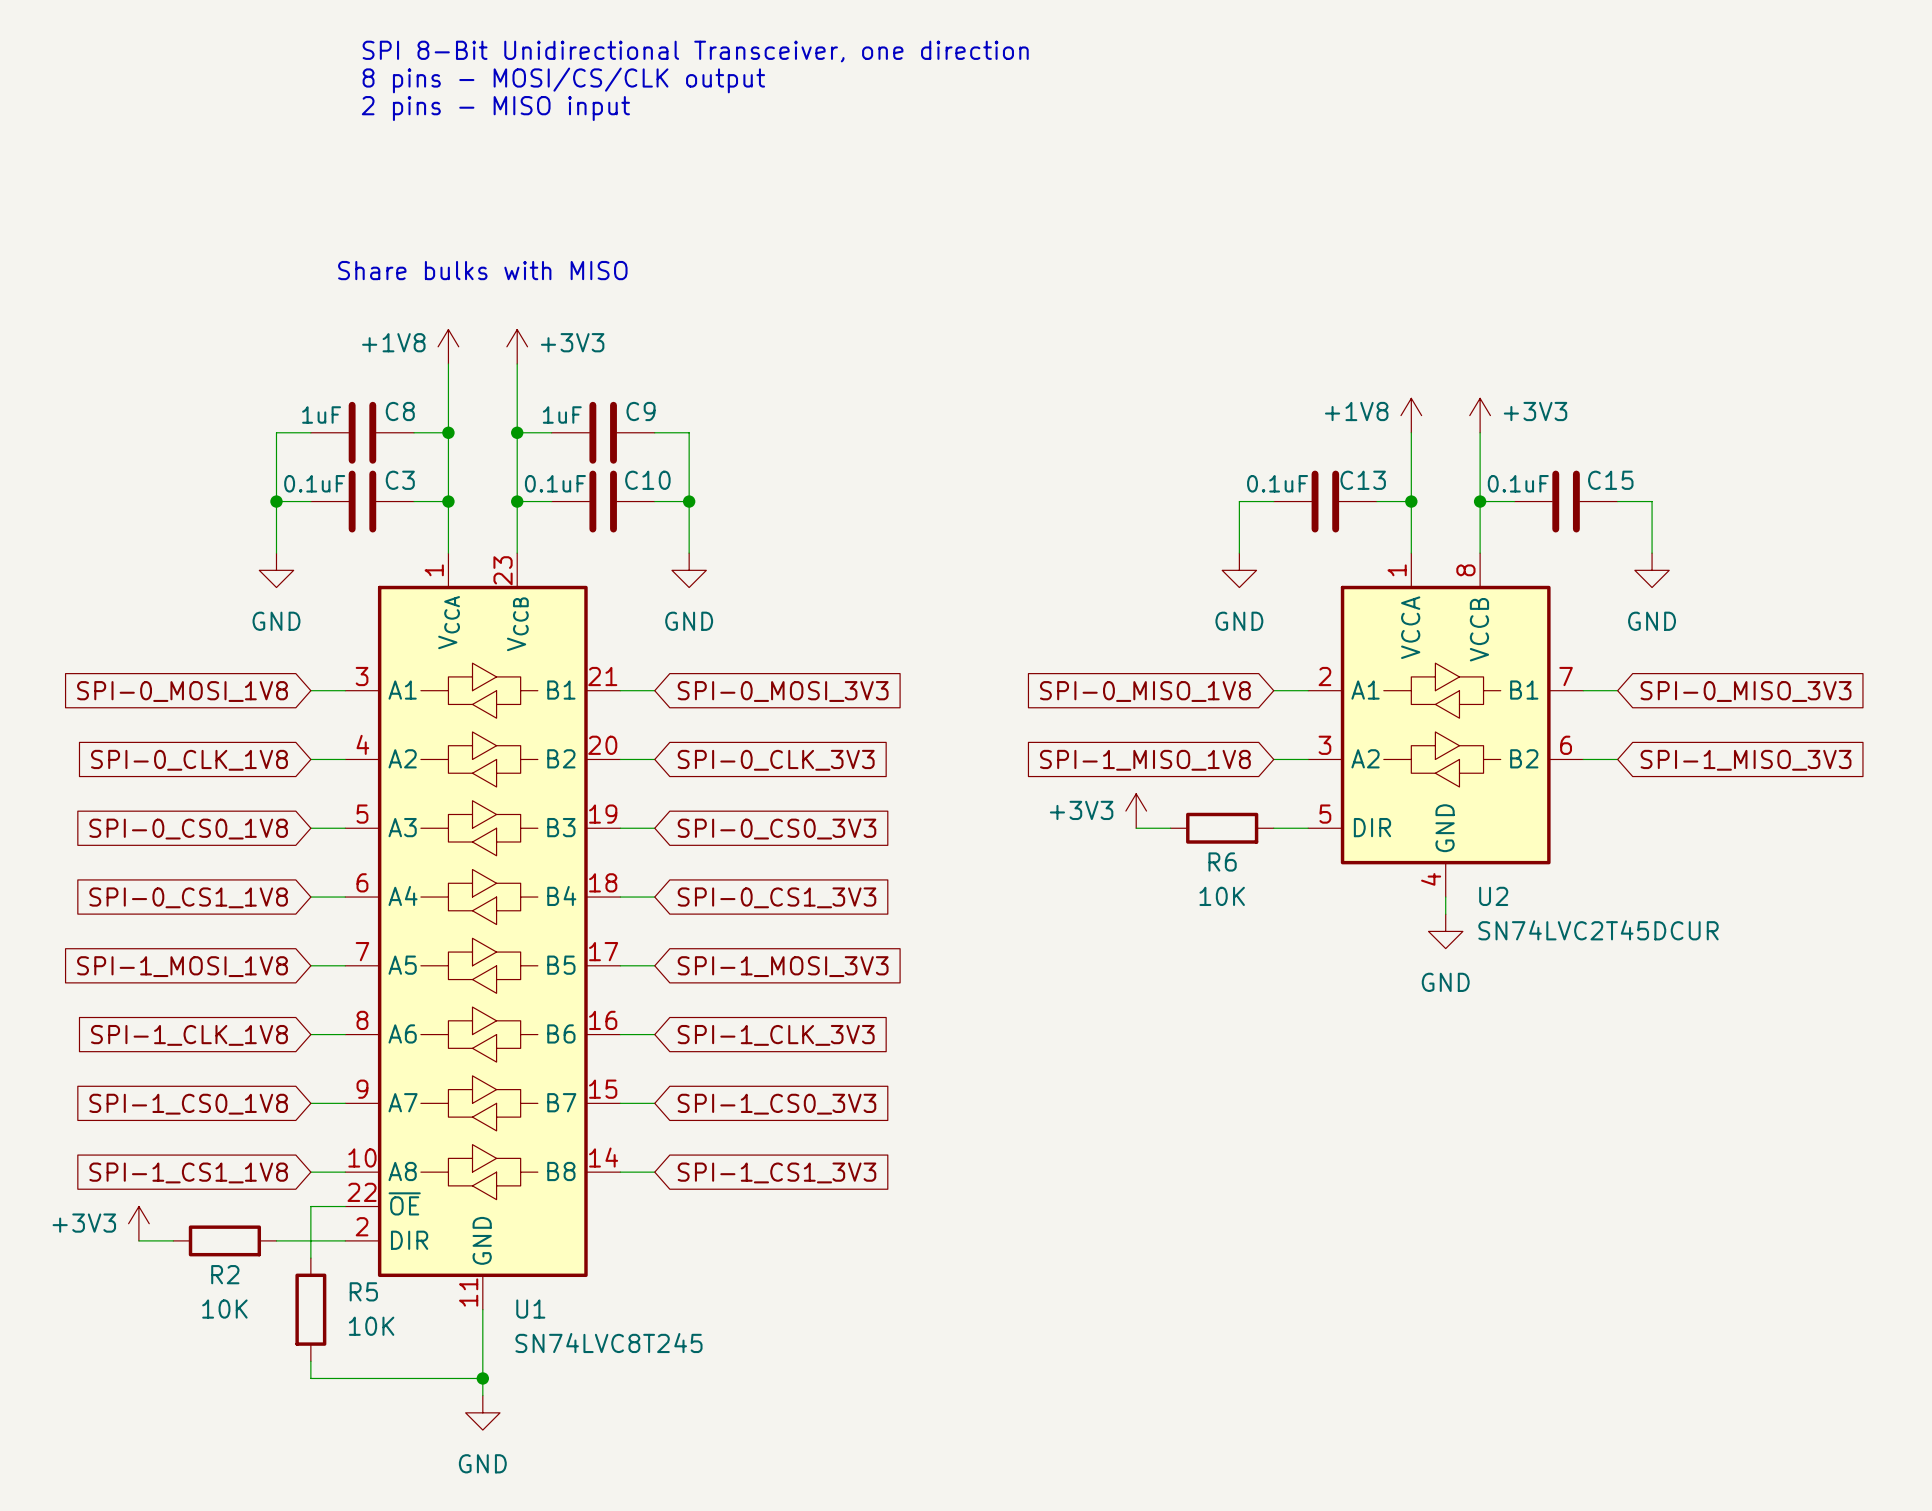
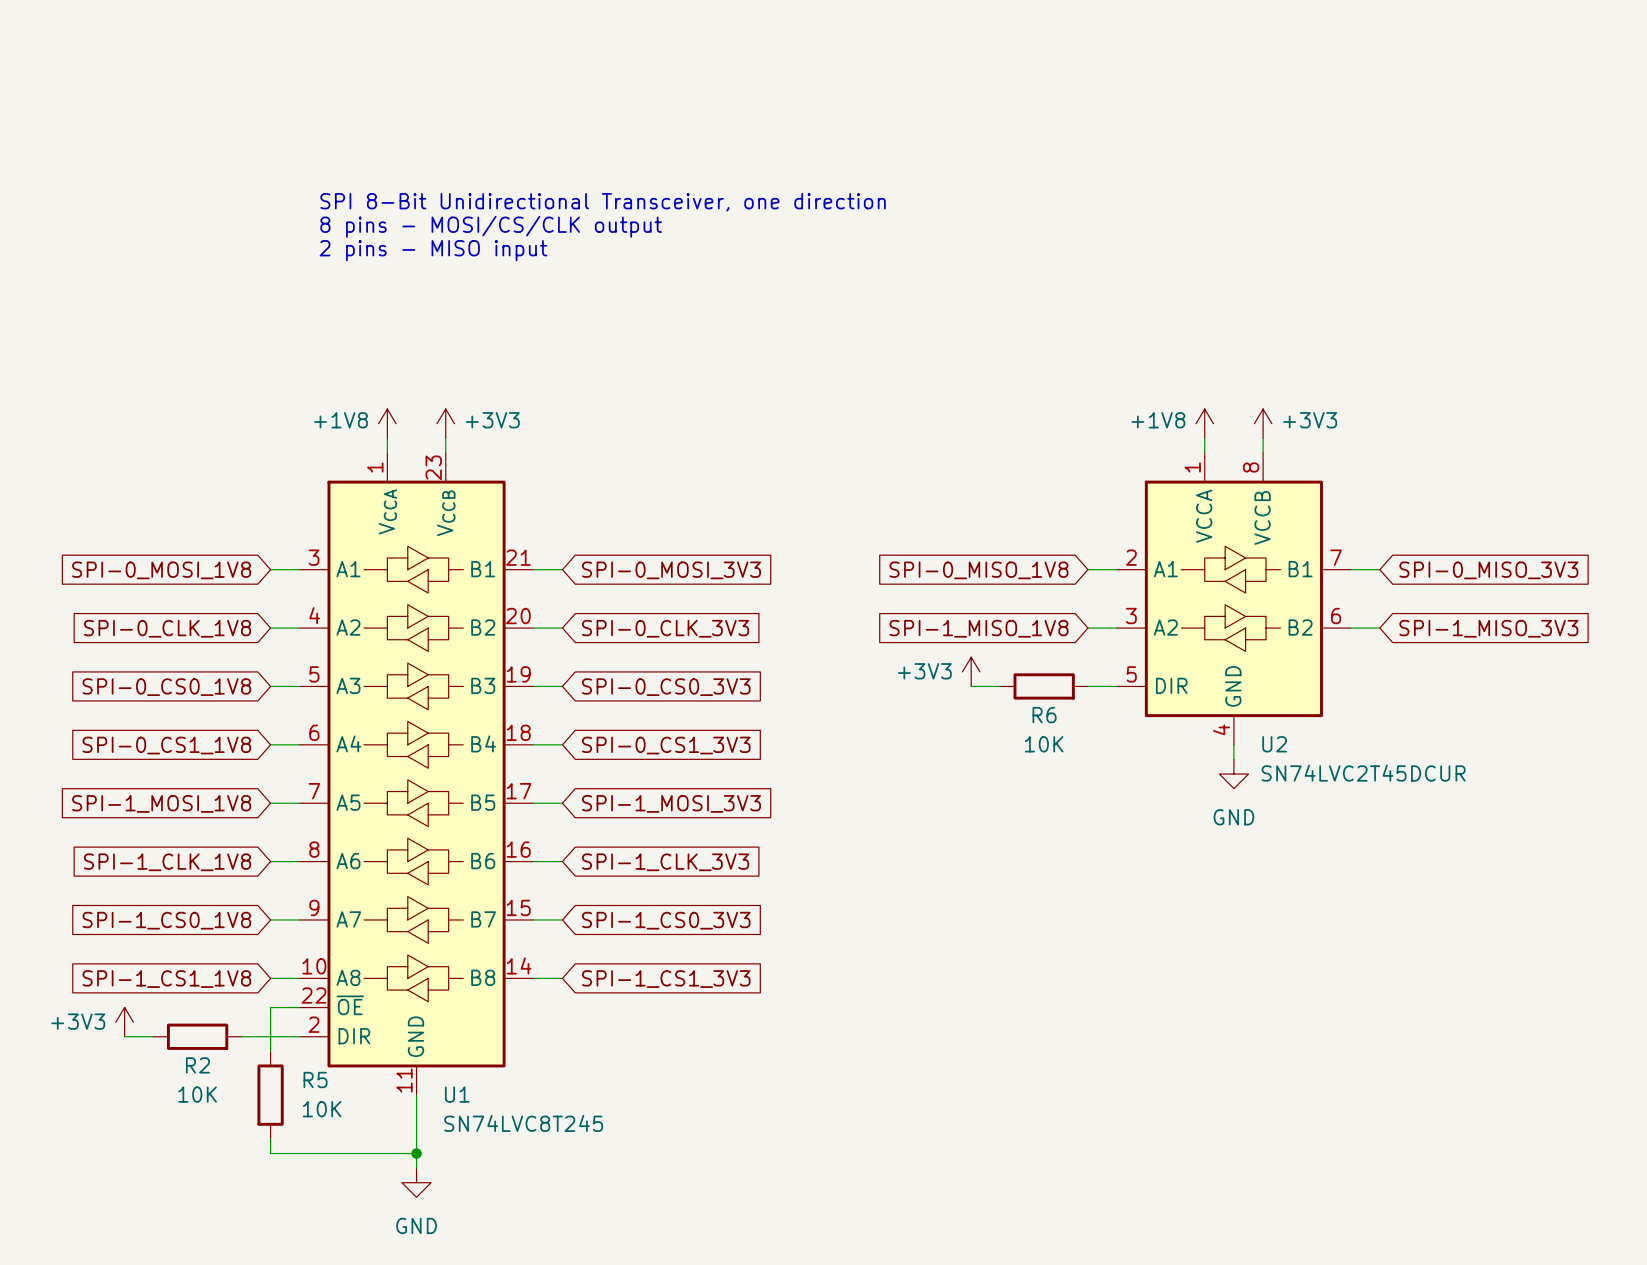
text position: SPI 8-Bit Unidirectional Transceiver, one direction (695, 51) -> SPI 8-Bit Unidirectional Transceiver, one direction (603, 202)
text position: 8 pins - MOSI/CS/CLK output (563, 80) -> 8 pins - MOSI/CS/CLK output (491, 226)
text position: 2 pins - MISO input (495, 108) -> 2 pins - MISO input (433, 250)
text: Share bulks with MISO (482, 270) -> none
power symbol position: +1V8 (448, 346) -> +1V8 (387, 423)
power symbol position: +3V3 (517, 346) -> +3V3 (445, 423)
wire: (448, 363) (448, 535) -> none
wire: (517, 363) (517, 535) -> none
power symbol position: +1V8 (1411, 415) -> +1V8 (1204, 423)
power symbol position: +3V3 (1480, 415) -> +3V3 (1263, 423)
wire: (310, 432) (276, 432) (276, 553) -> none
C8: 1uF (362, 432) -> none
wire: (414, 432) (448, 432) -> none
junction: (448, 432) -> none
wire: (517, 432) (551, 432) -> none
junction: (517, 432) -> none
C9: 1uF (603, 432) -> none
wire: (654, 432) (689, 432) (689, 553) -> none
wire: (1411, 432) (1411, 535) -> none
wire: (1480, 432) (1480, 535) -> none
wire: (276, 501) (310, 501) -> none
junction: (276, 501) -> none
C3: 0.1uF (362, 501) -> none
wire: (414, 501) (448, 501) -> none
junction: (448, 501) -> none
wire: (517, 501) (551, 501) -> none
junction: (517, 501) -> none
C10: 0.1uF (603, 501) -> none
wire: (654, 501) (689, 501) -> none
junction: (689, 501) -> none
wire: (1273, 501) (1239, 501) (1239, 553) -> none
C13: 0.1uF (1325, 501) -> none
wire: (1376, 501) (1411, 501) -> none
junction: (1411, 501) -> none
wire: (1480, 501) (1514, 501) -> none
junction: (1480, 501) -> none
C15: 0.1uF (1566, 501) -> none
wire: (1617, 501) (1652, 501) (1652, 553) -> none
power symbol: GND (276, 570) -> none
power symbol: GND (689, 570) -> none
power symbol: GND (1239, 570) -> none
power symbol: GND (1652, 570) -> none

